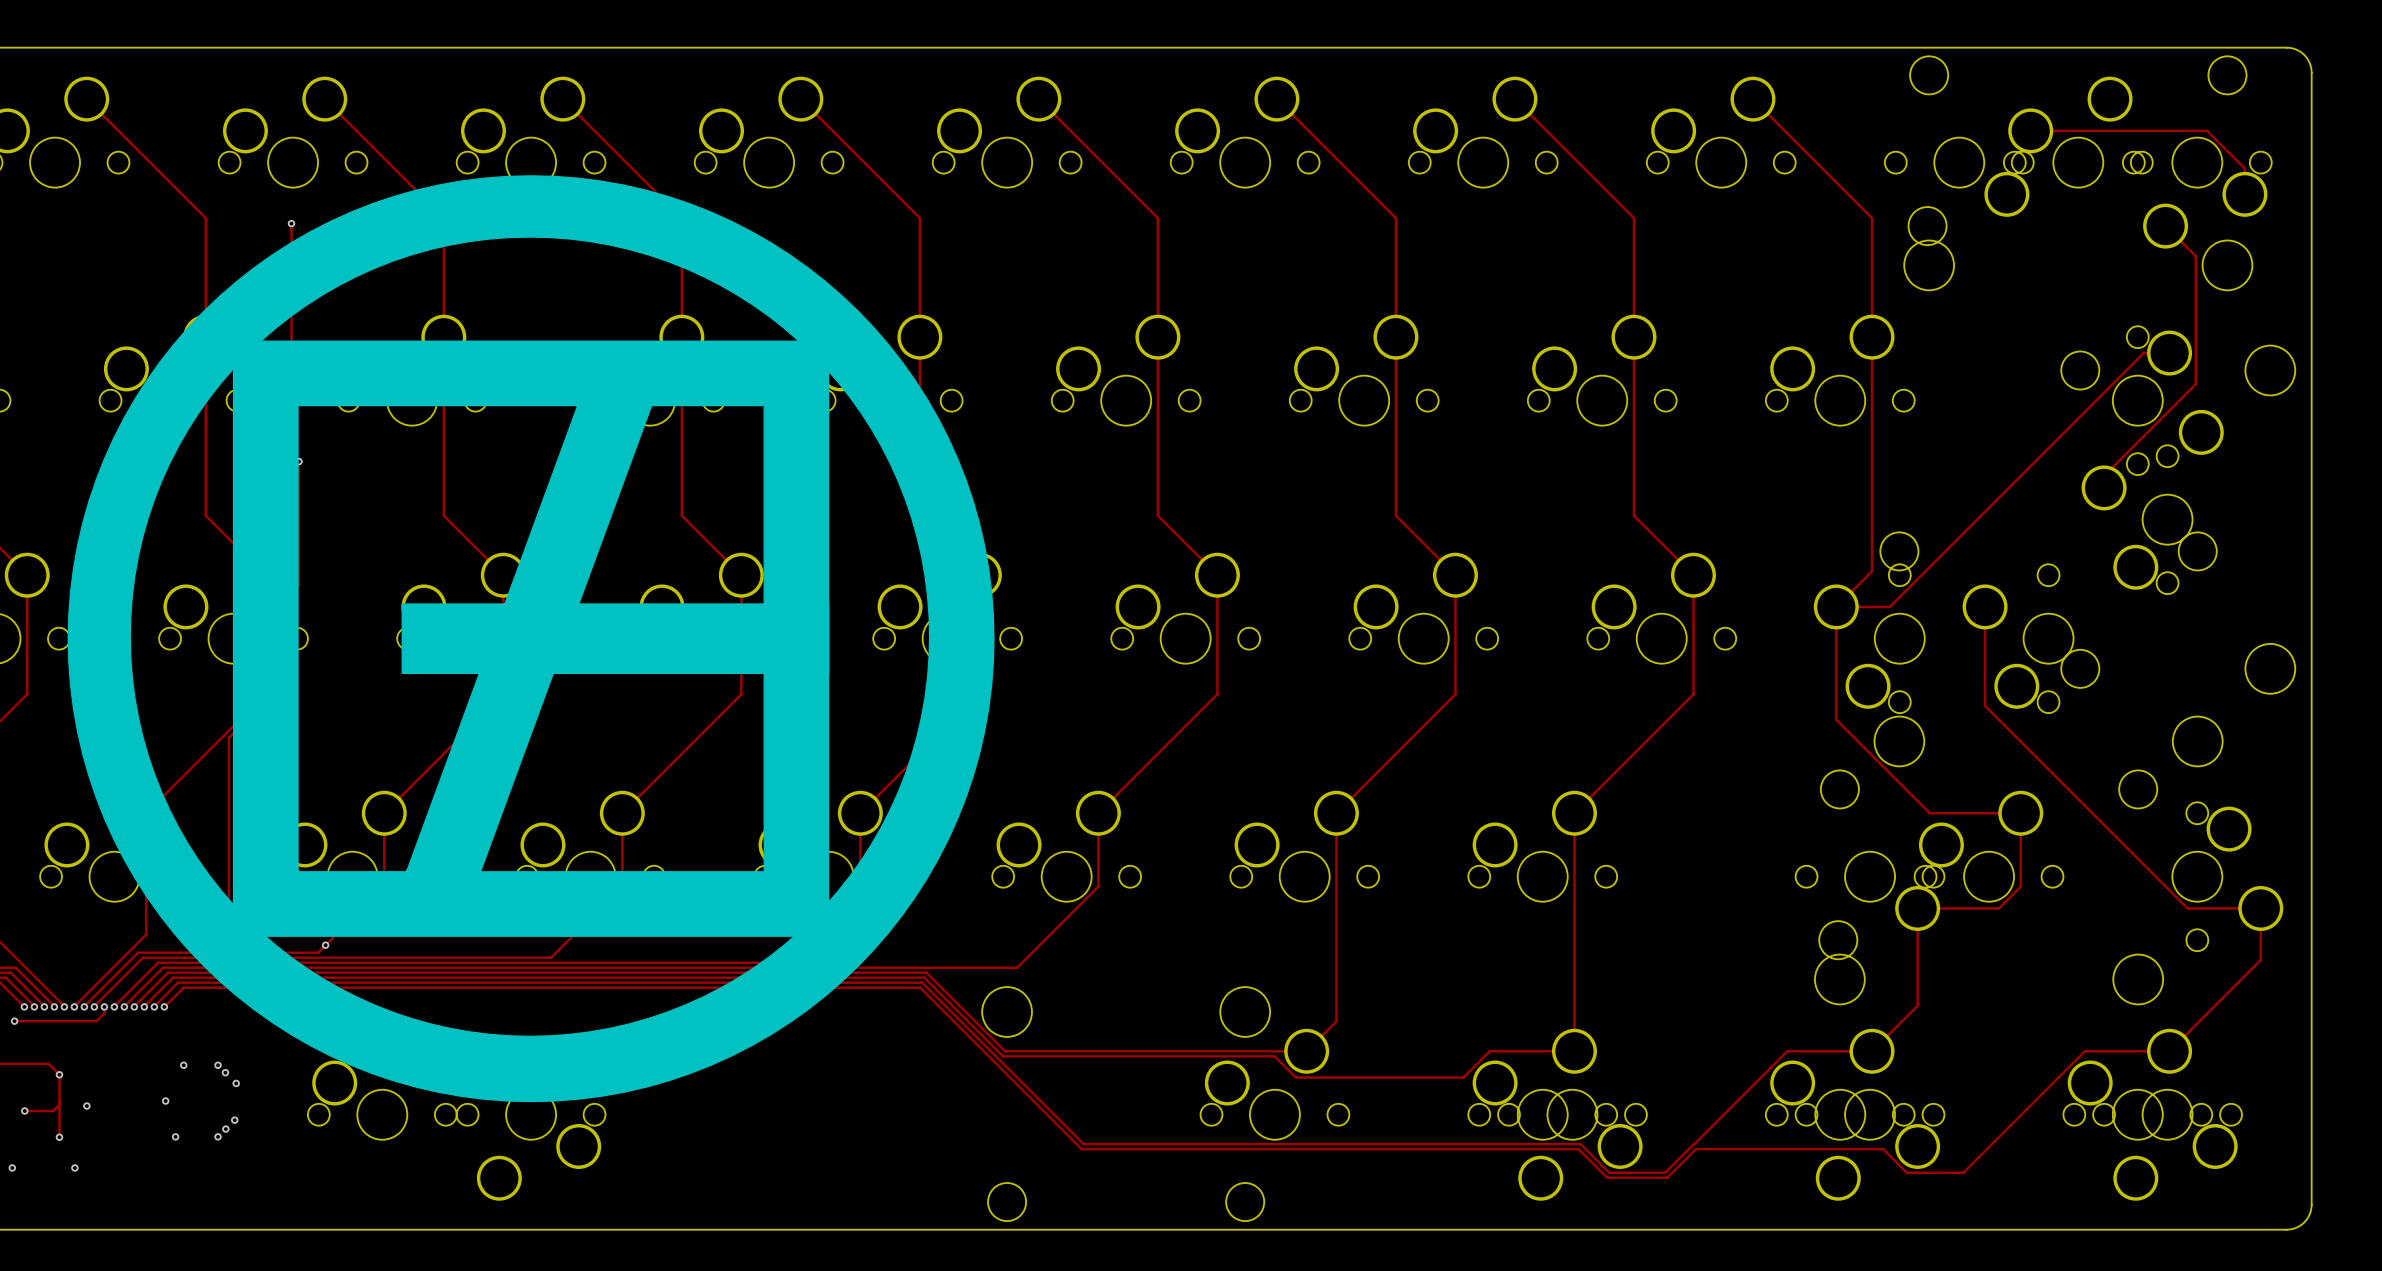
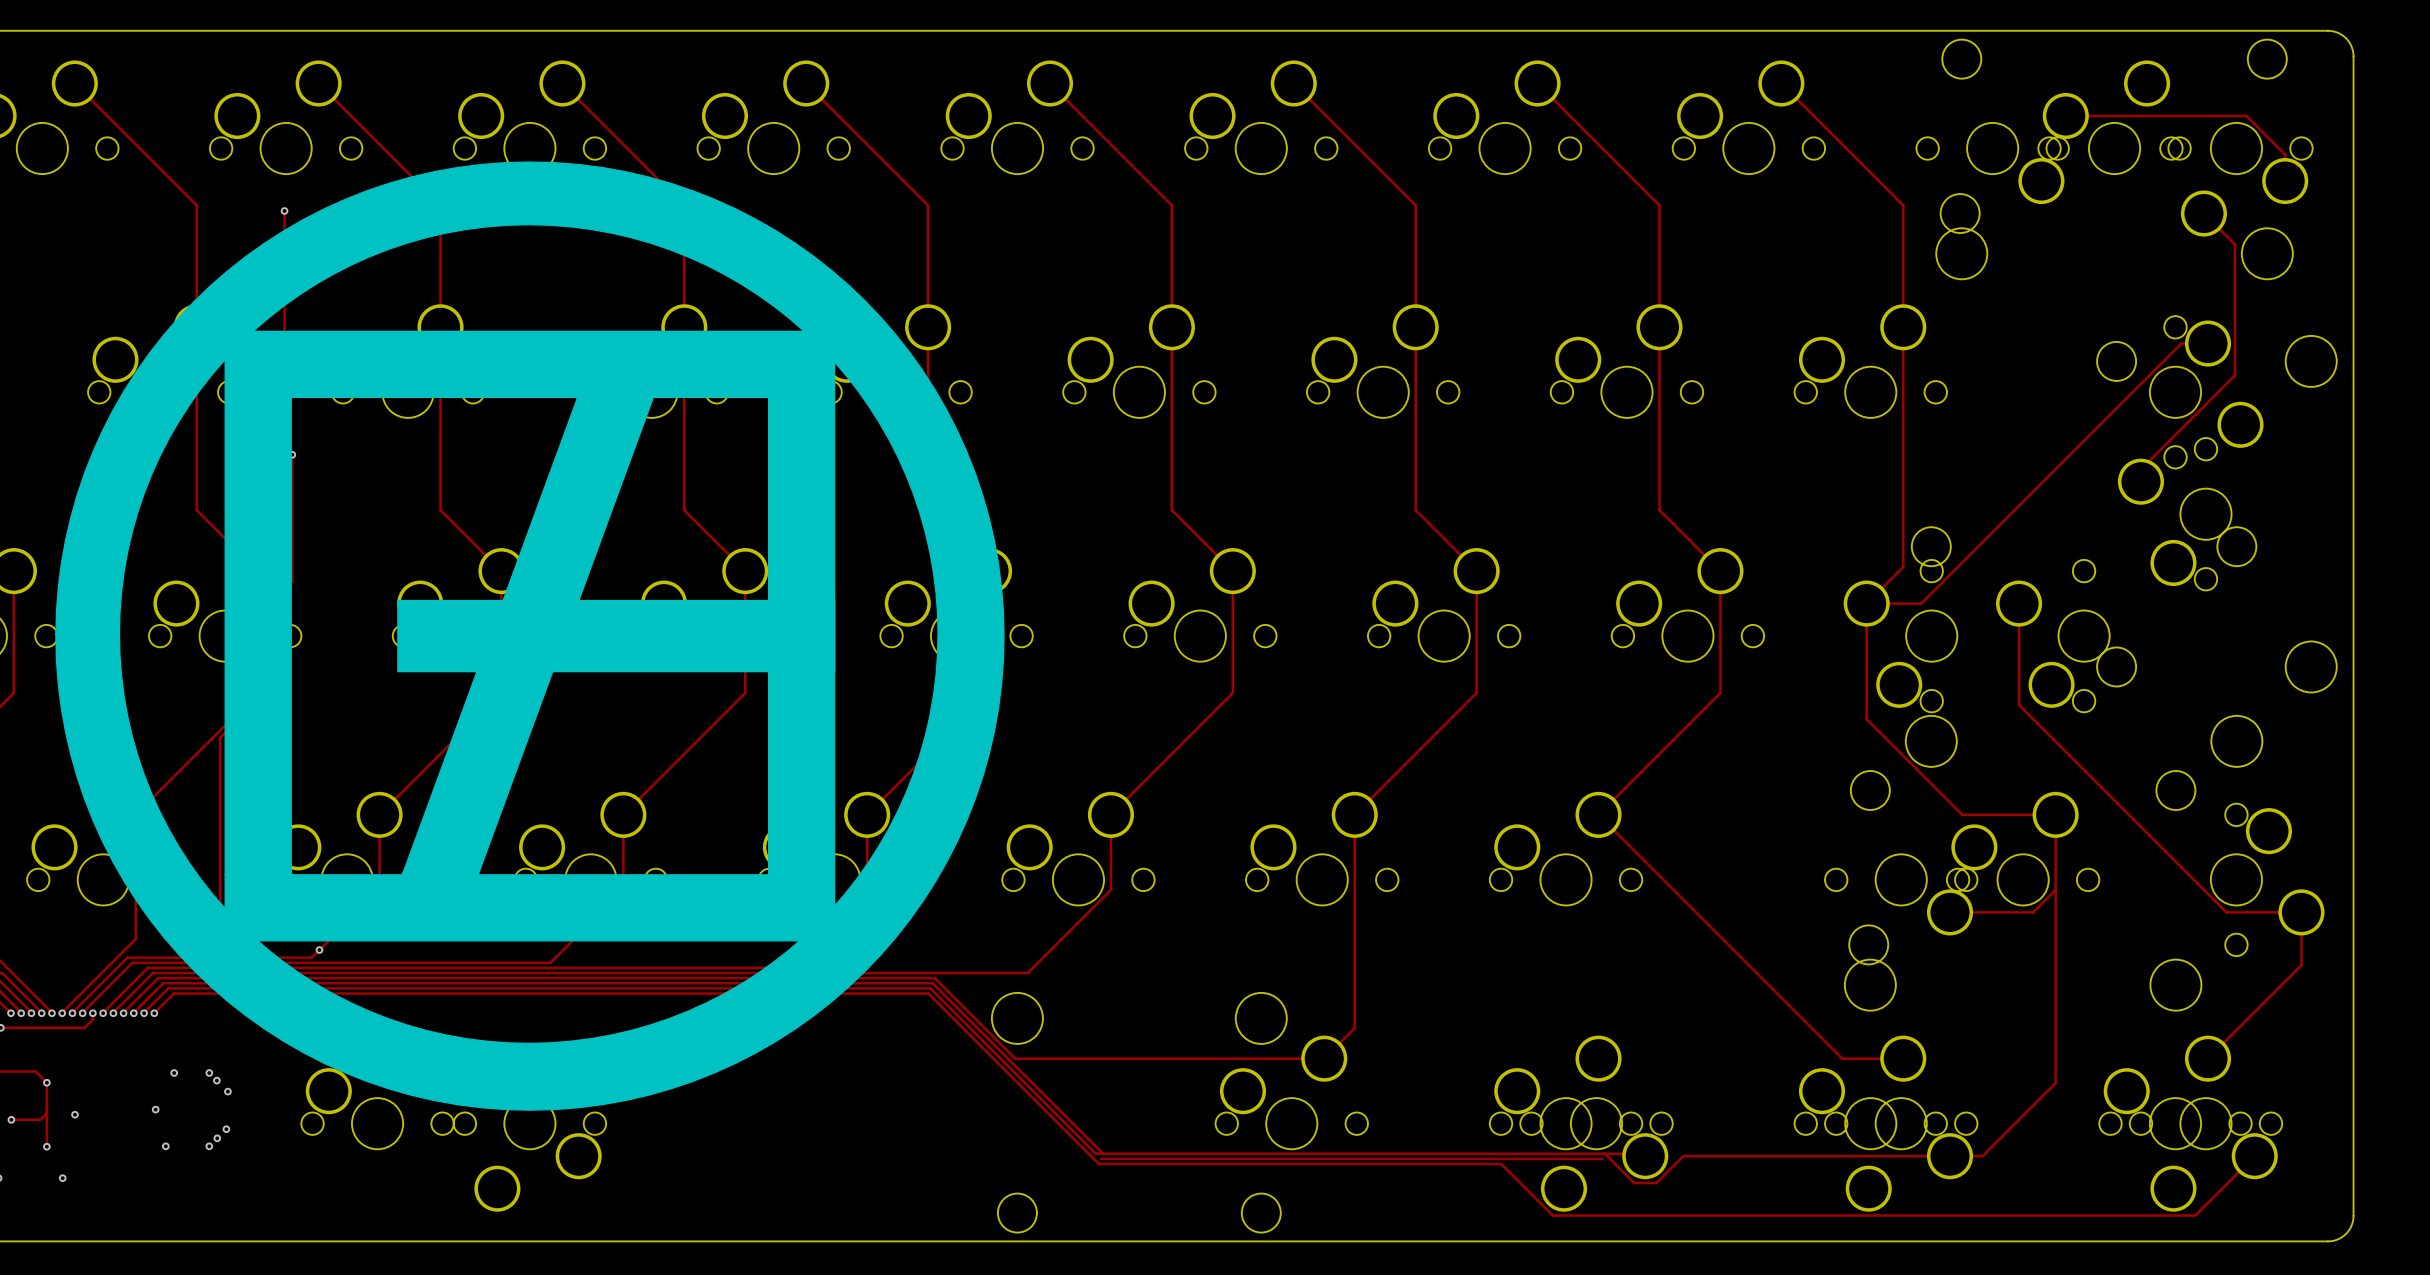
track: (1574, 813) (1574, 1051) (1489, 1051) (1463, 1077) (1295, 1077) (1274, 1056) (1002, 1056) -> (1103, 1153) (1013, 1063)
track: none -> (1598, 814) (1842, 1058)
track: (1917, 908) (1917, 1005) (1872, 1051) -> none
track: (1812, 1051) (1787, 1051) (1665, 1172) (1630, 1172) -> (2055, 889) (2055, 1083) (1982, 1156) (1683, 1156) (1656, 1183)
track: (2169, 1051) (2084, 1051) (1963, 1172) (1906, 1172) (1883, 1149) (1695, 1149) (1667, 1177) (1607, 1177) (1578, 1149) -> none
track: none -> (1604, 1153) (1642, 1153) (1645, 1156)
track: (1081, 1149) (1088, 1149) -> (1093, 1158) (1098, 1163) (1501, 1163) (1552, 1215) (2195, 1215) (2254, 1156)

